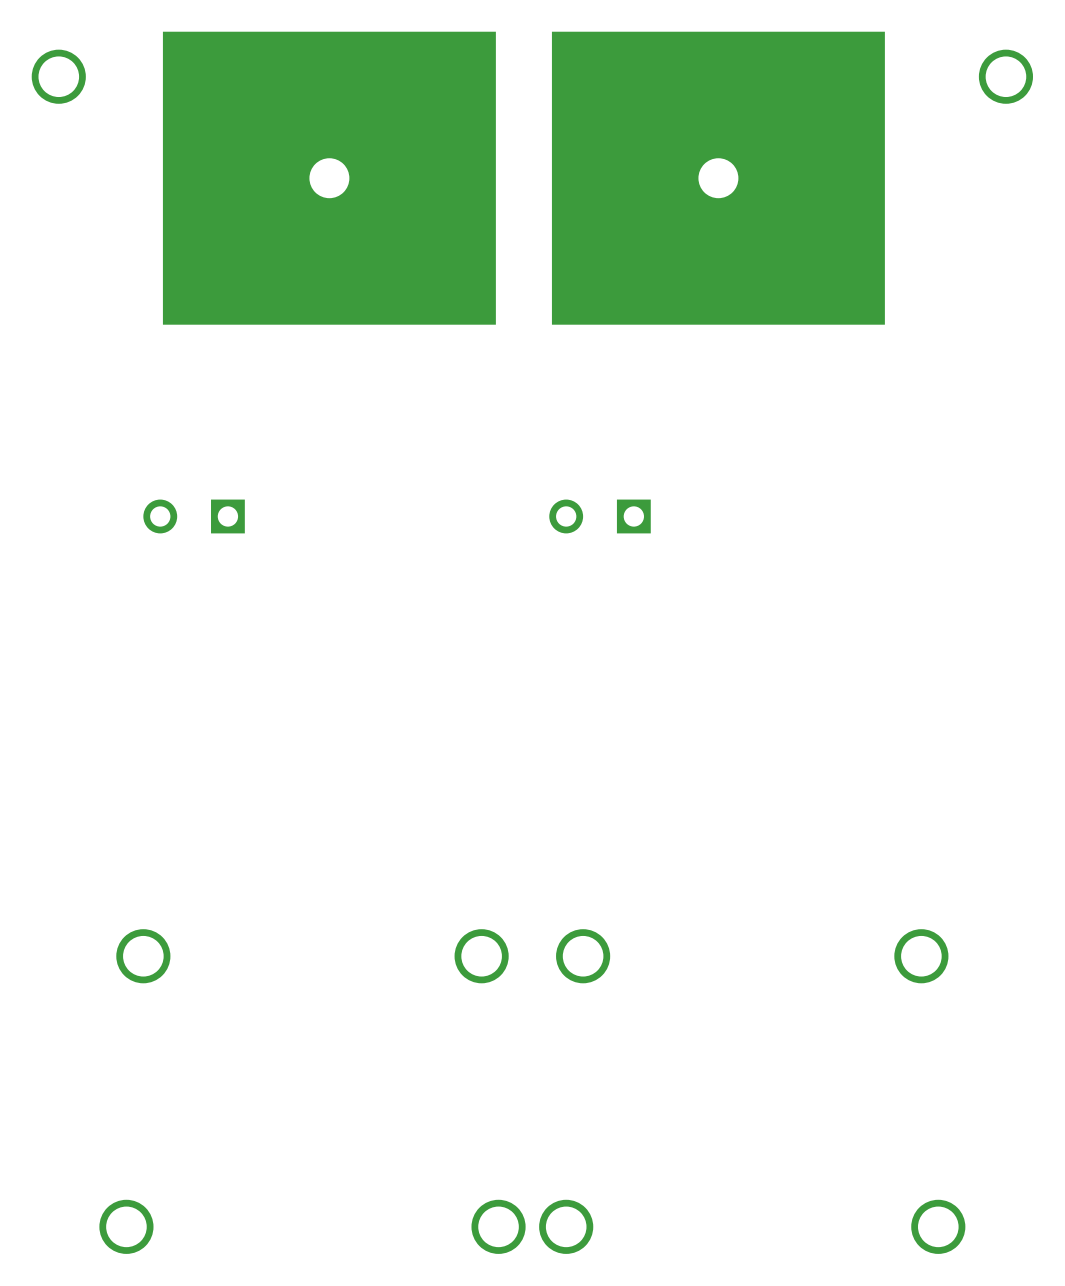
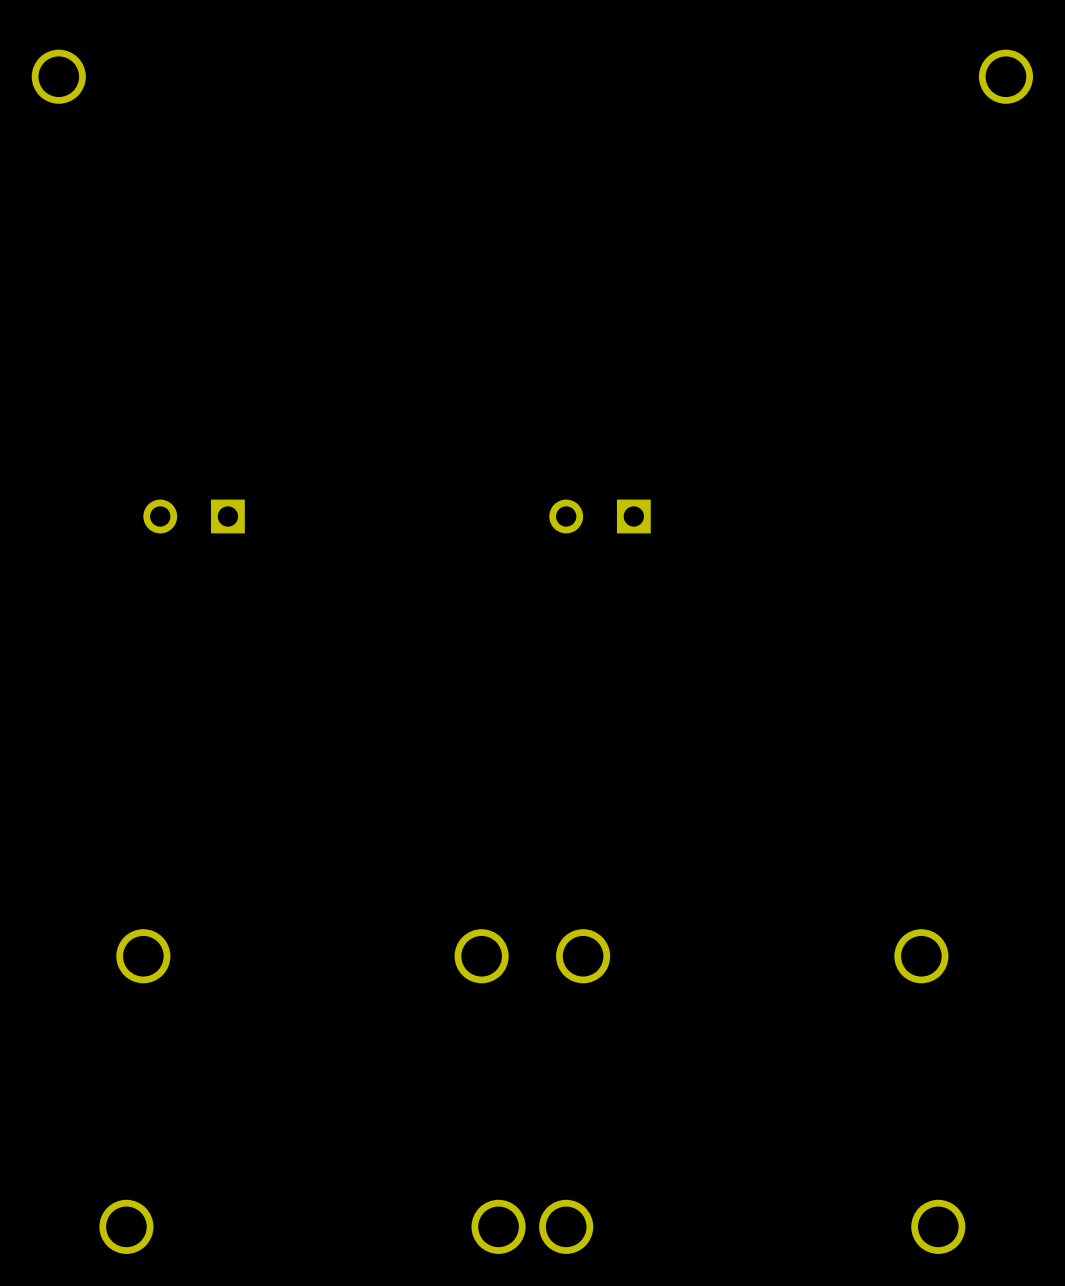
part: (329, 178) -> none
part: (718, 178) -> none

